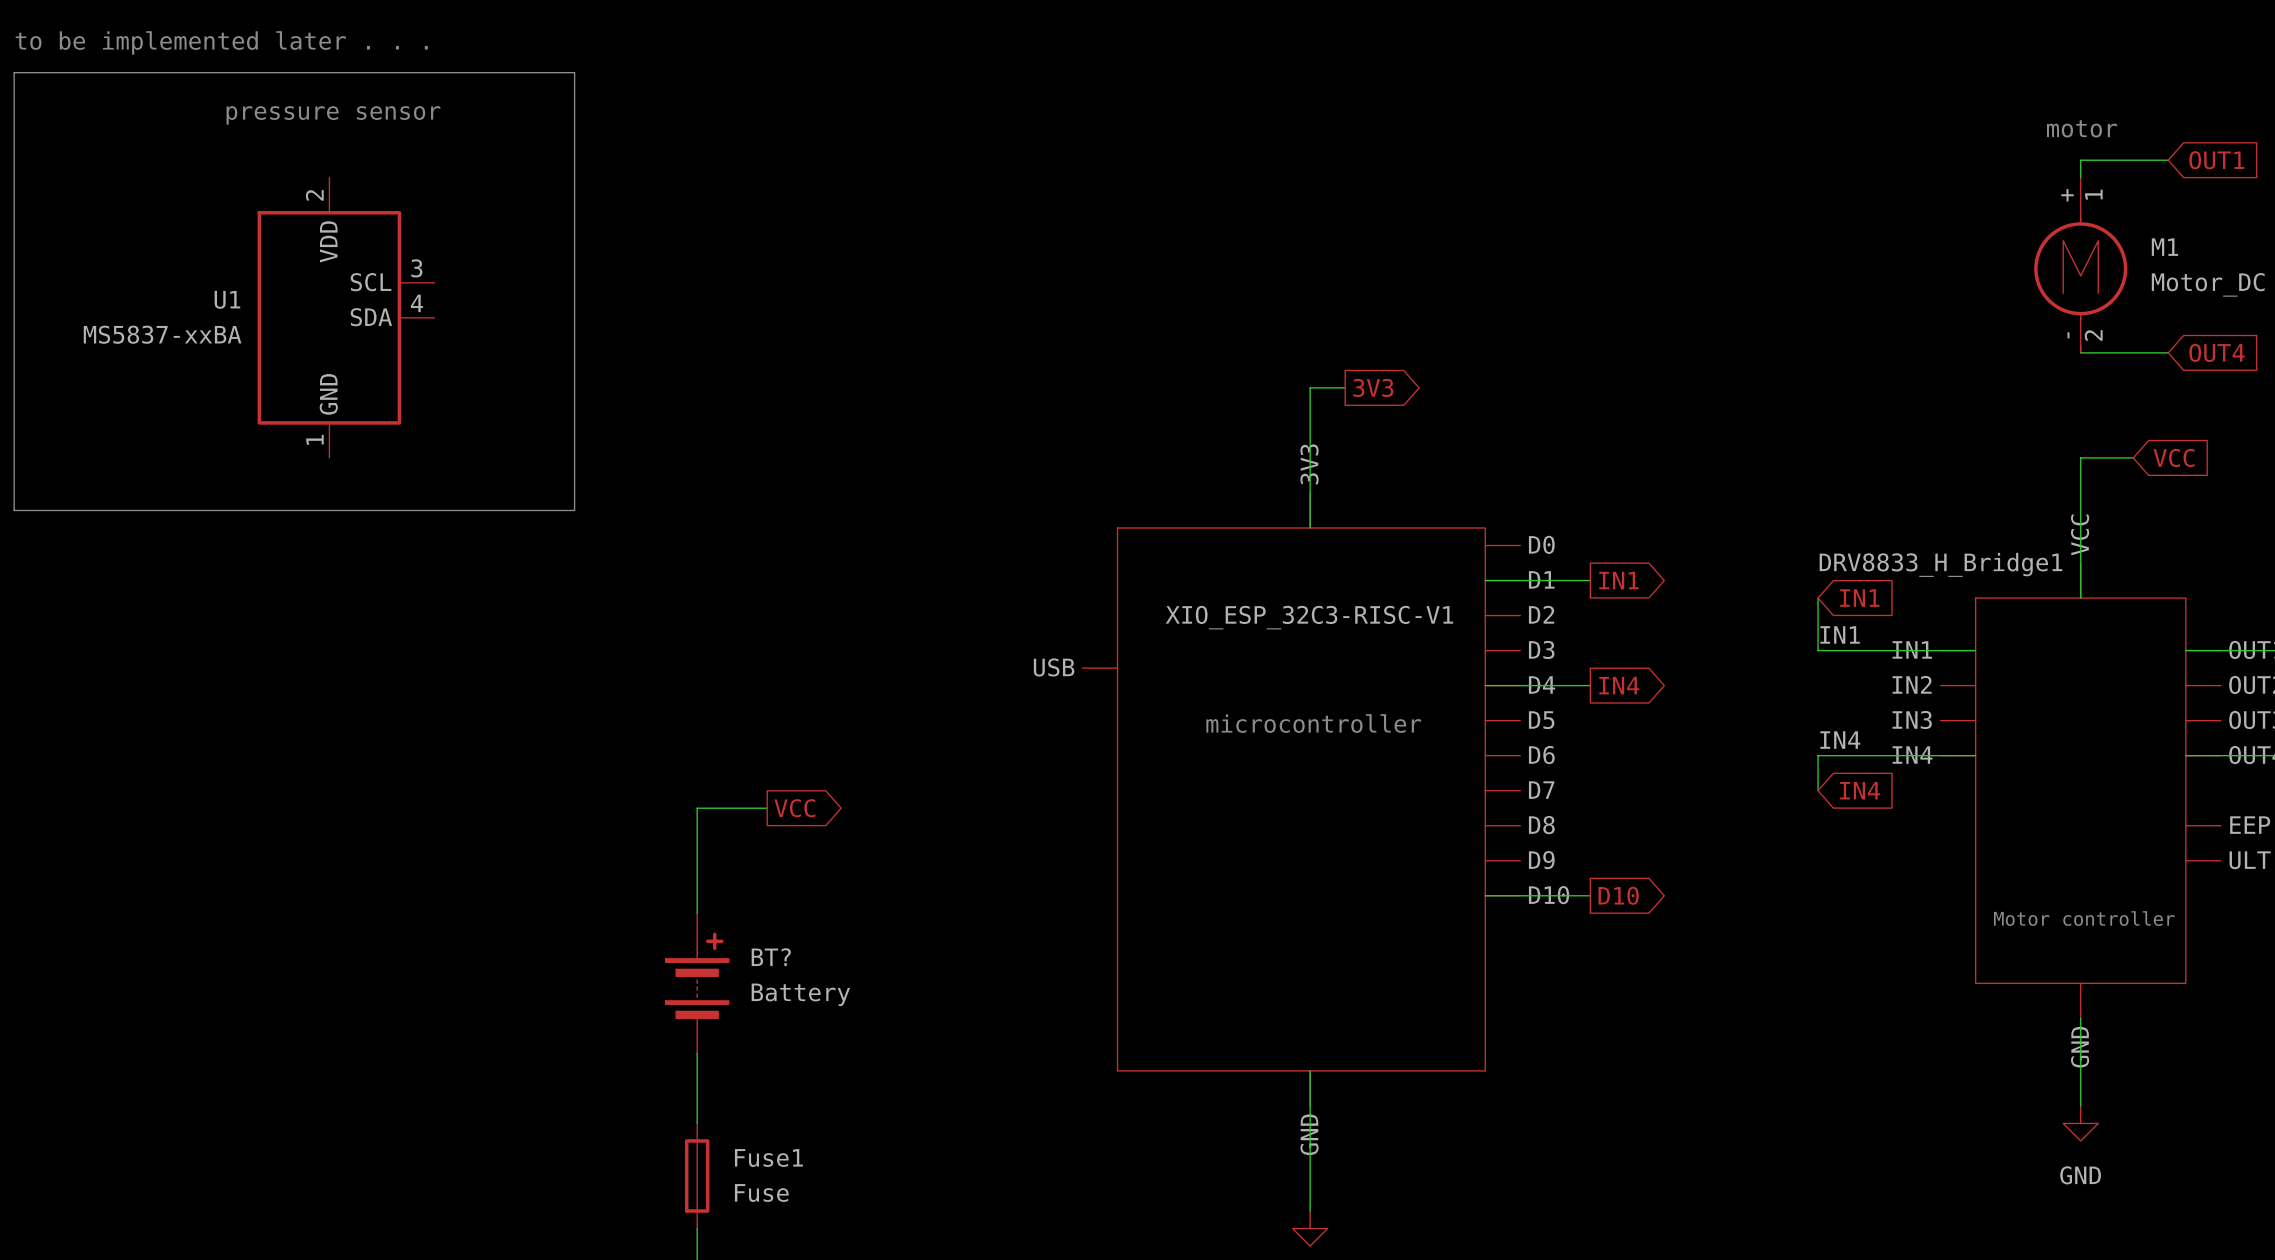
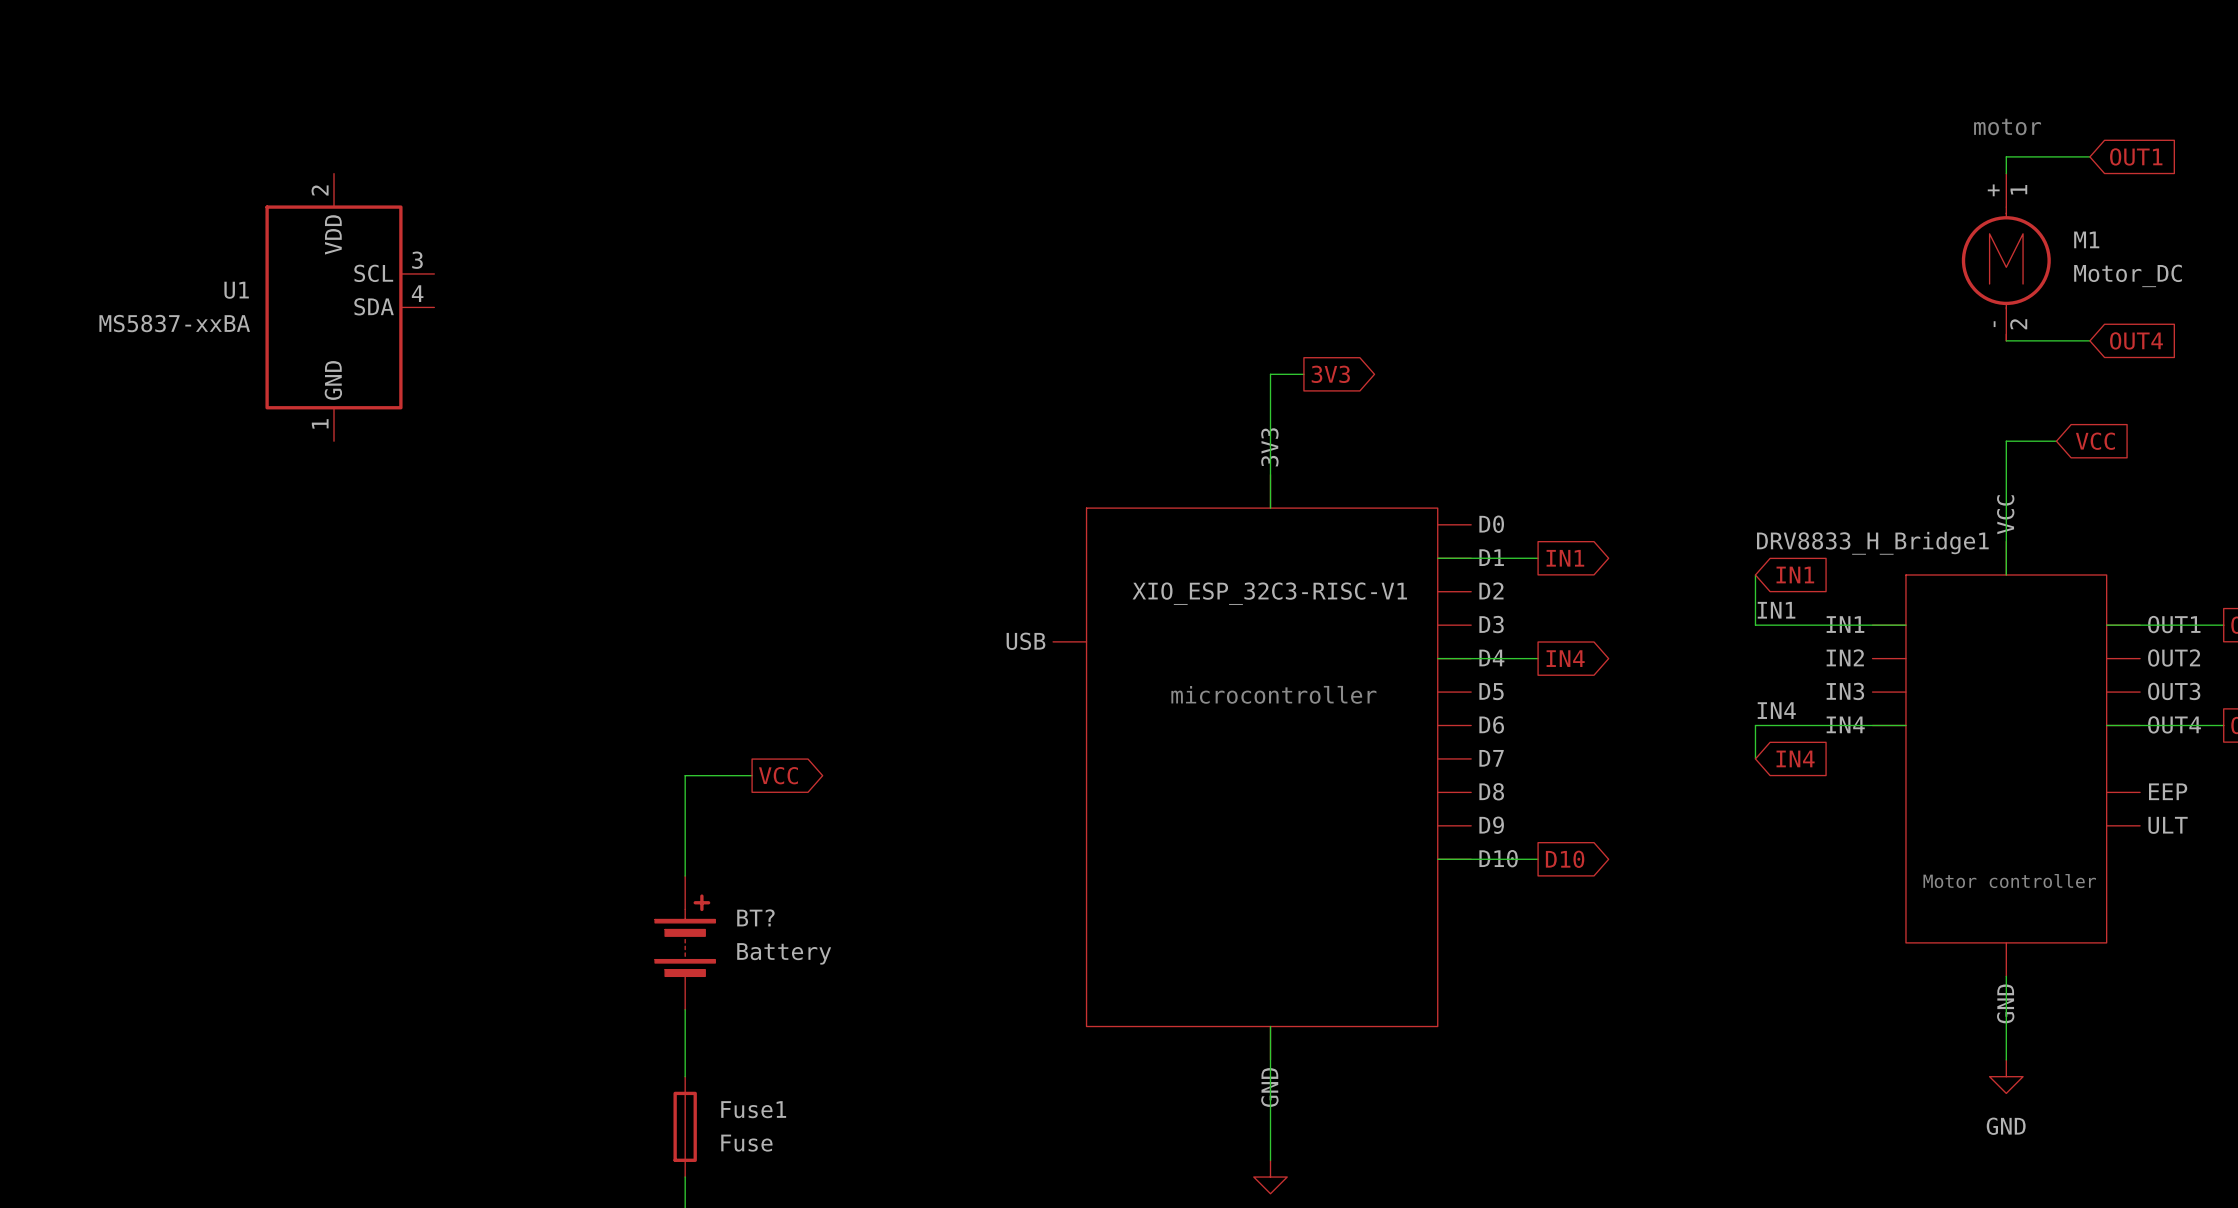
text: to be implemented later . . . (221, 42) -> none
line: (14, 72) (574, 72) (574, 510) (14, 510) (14, 72) -> none
text: pressure sensor (333, 115) -> none

